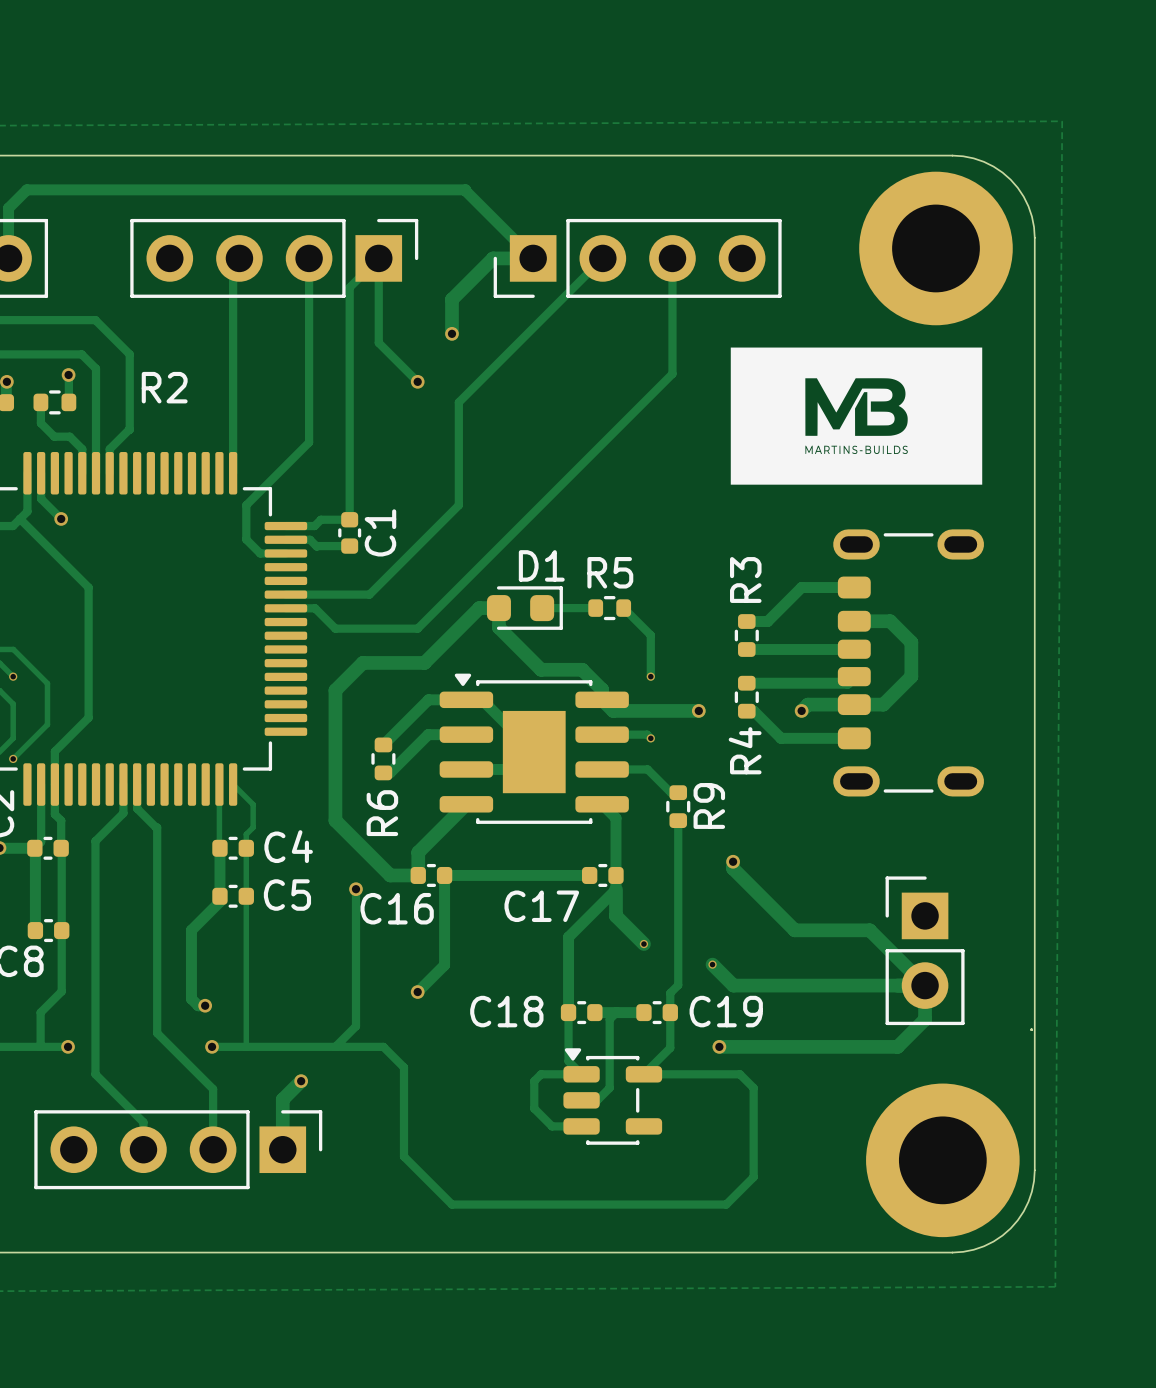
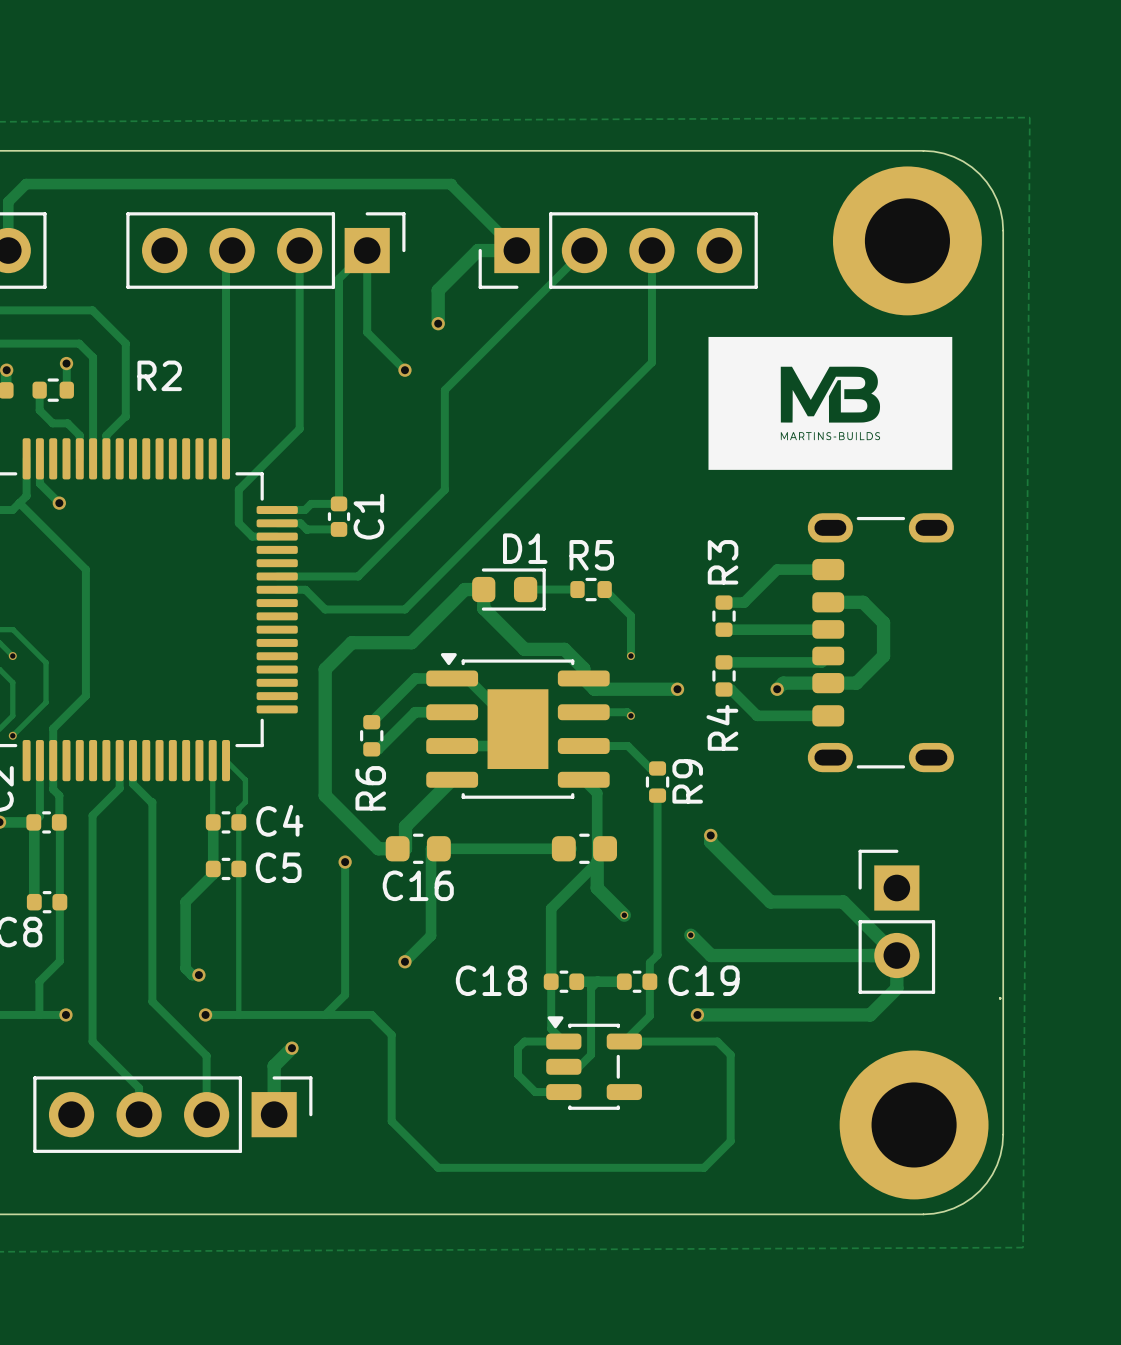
C16 footprint: [410, 863, 453, 887] -> [385, 833, 451, 864]
C17: (602, 875) -> none
part: none -> (584, 848)
C16 name position: C16 (397, 908) -> C16 (418, 885)

